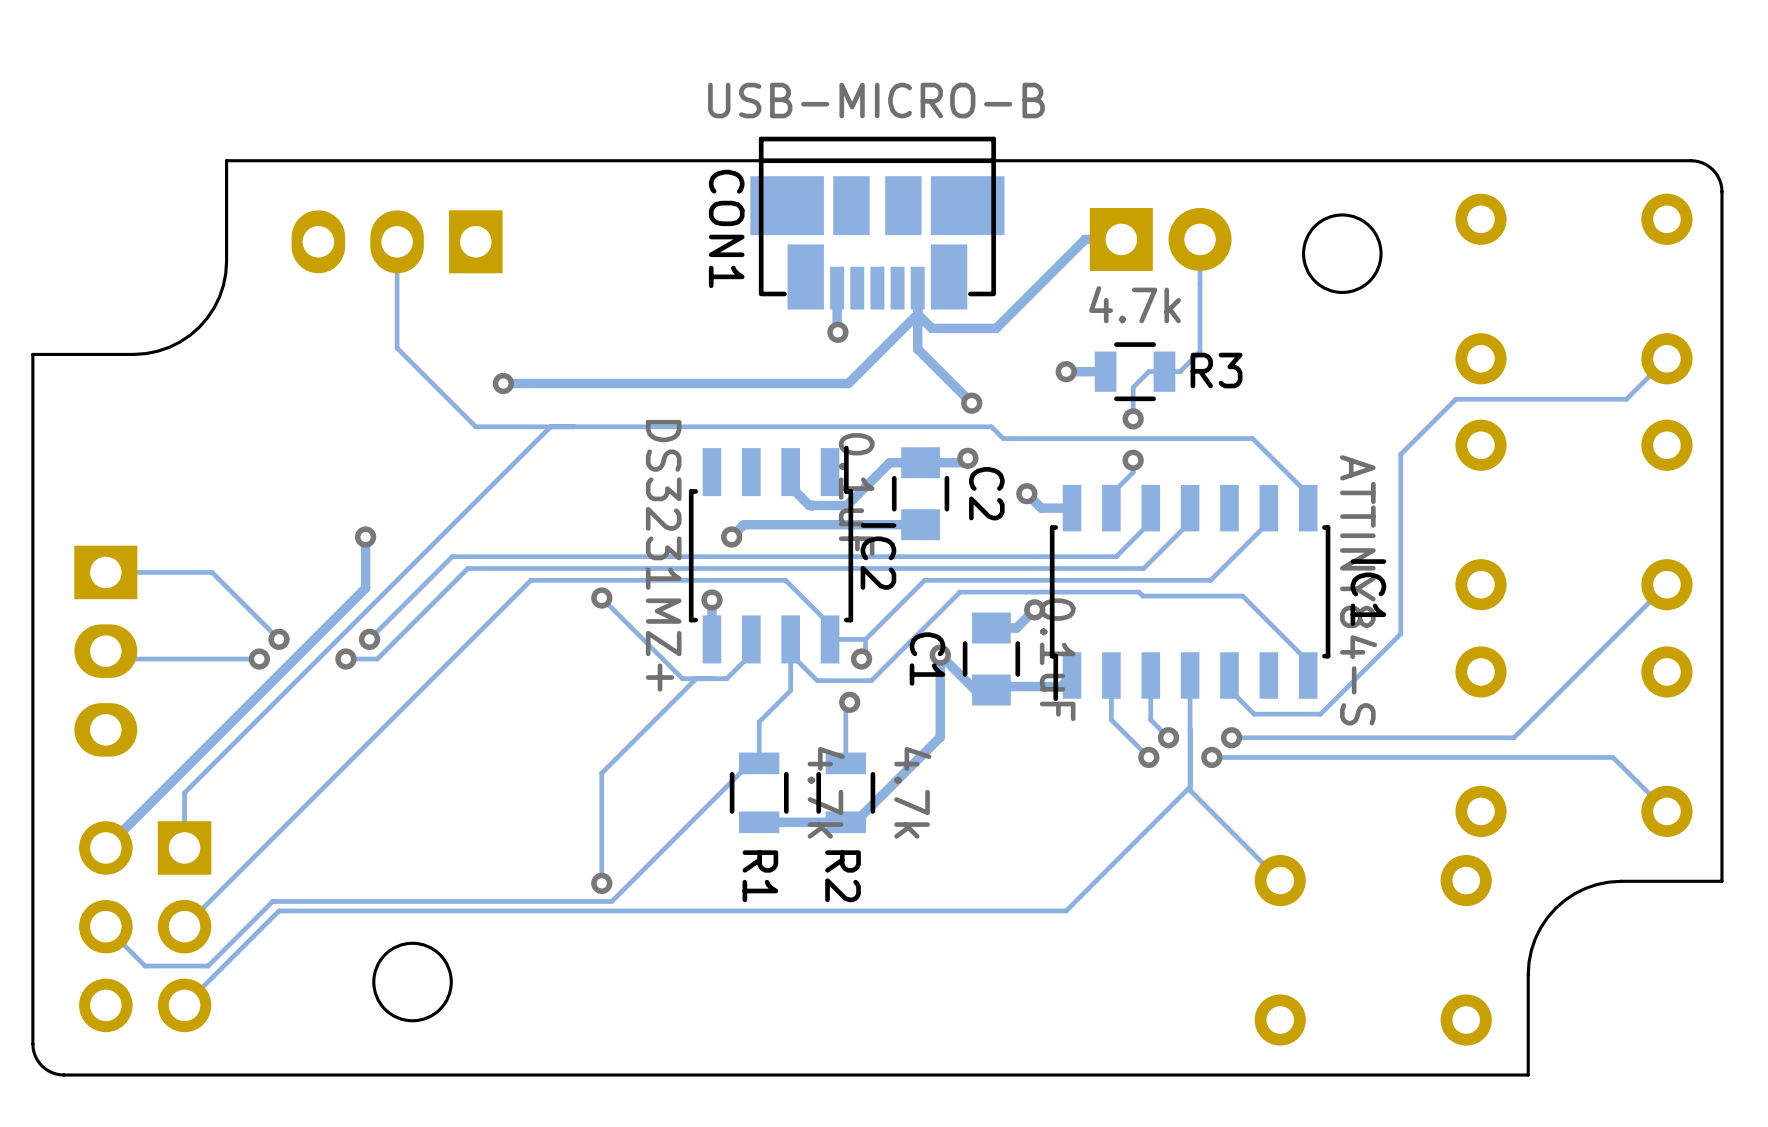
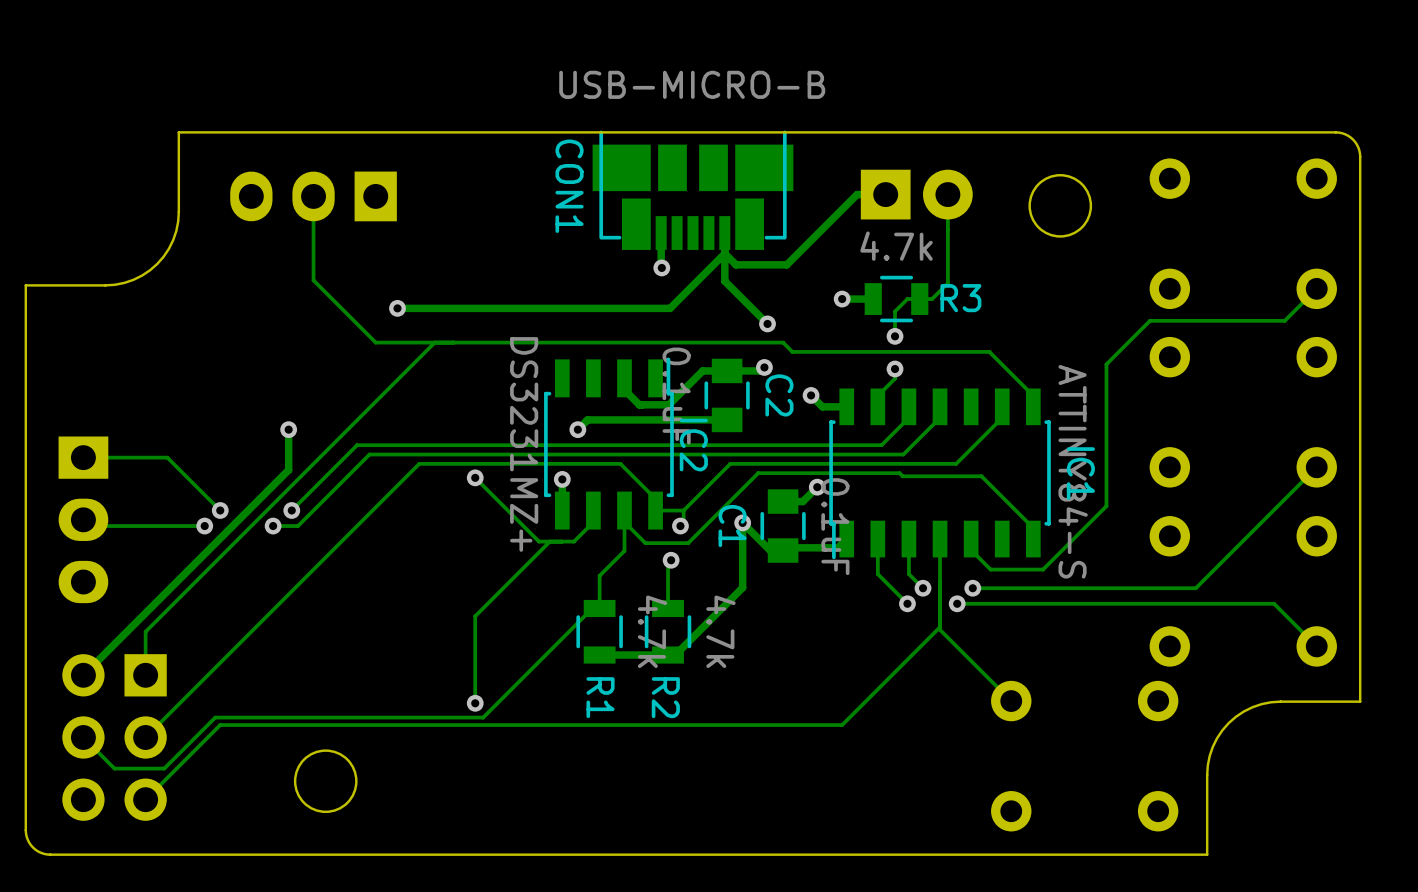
CON1 footprint: [750, 136, 1005, 310] -> [592, 130, 794, 250]

